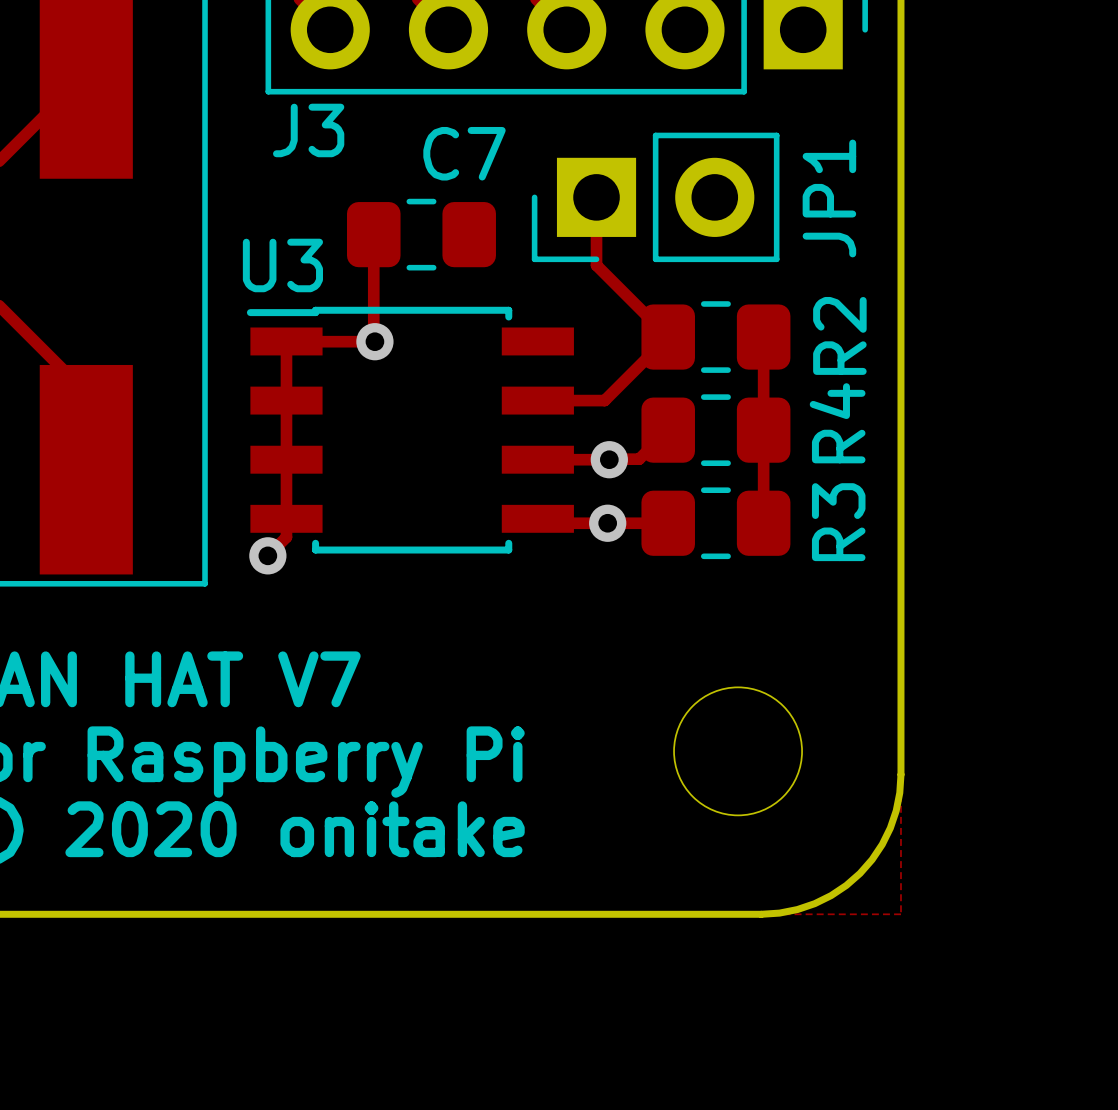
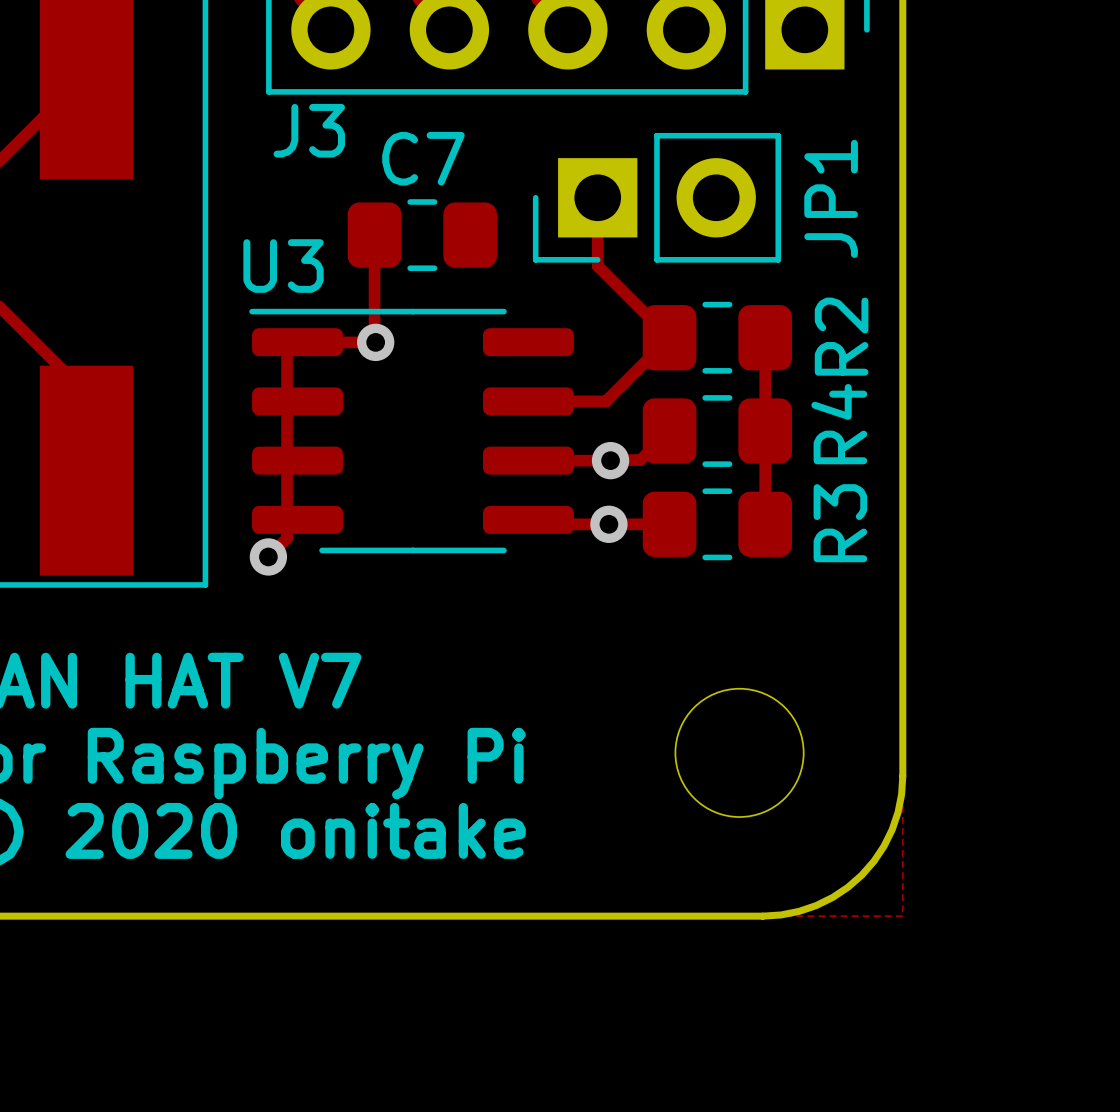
C7 name position: C7 (464, 153) -> C7 (423, 158)
U3 footprint: [246, 306, 574, 554] -> [249, 308, 574, 554]

